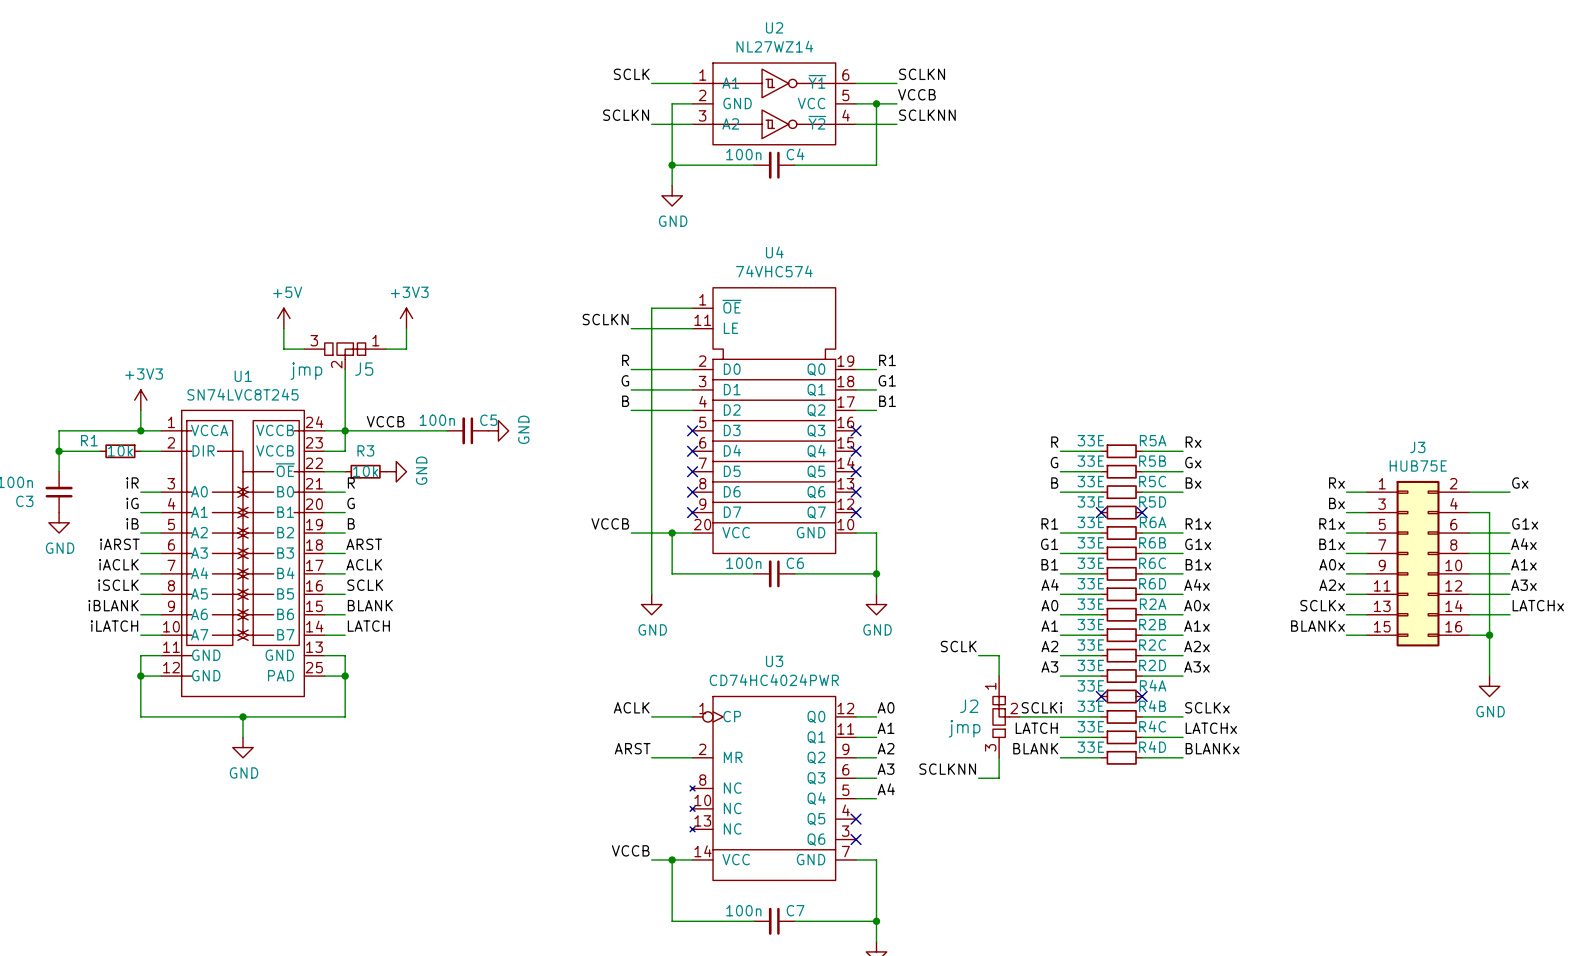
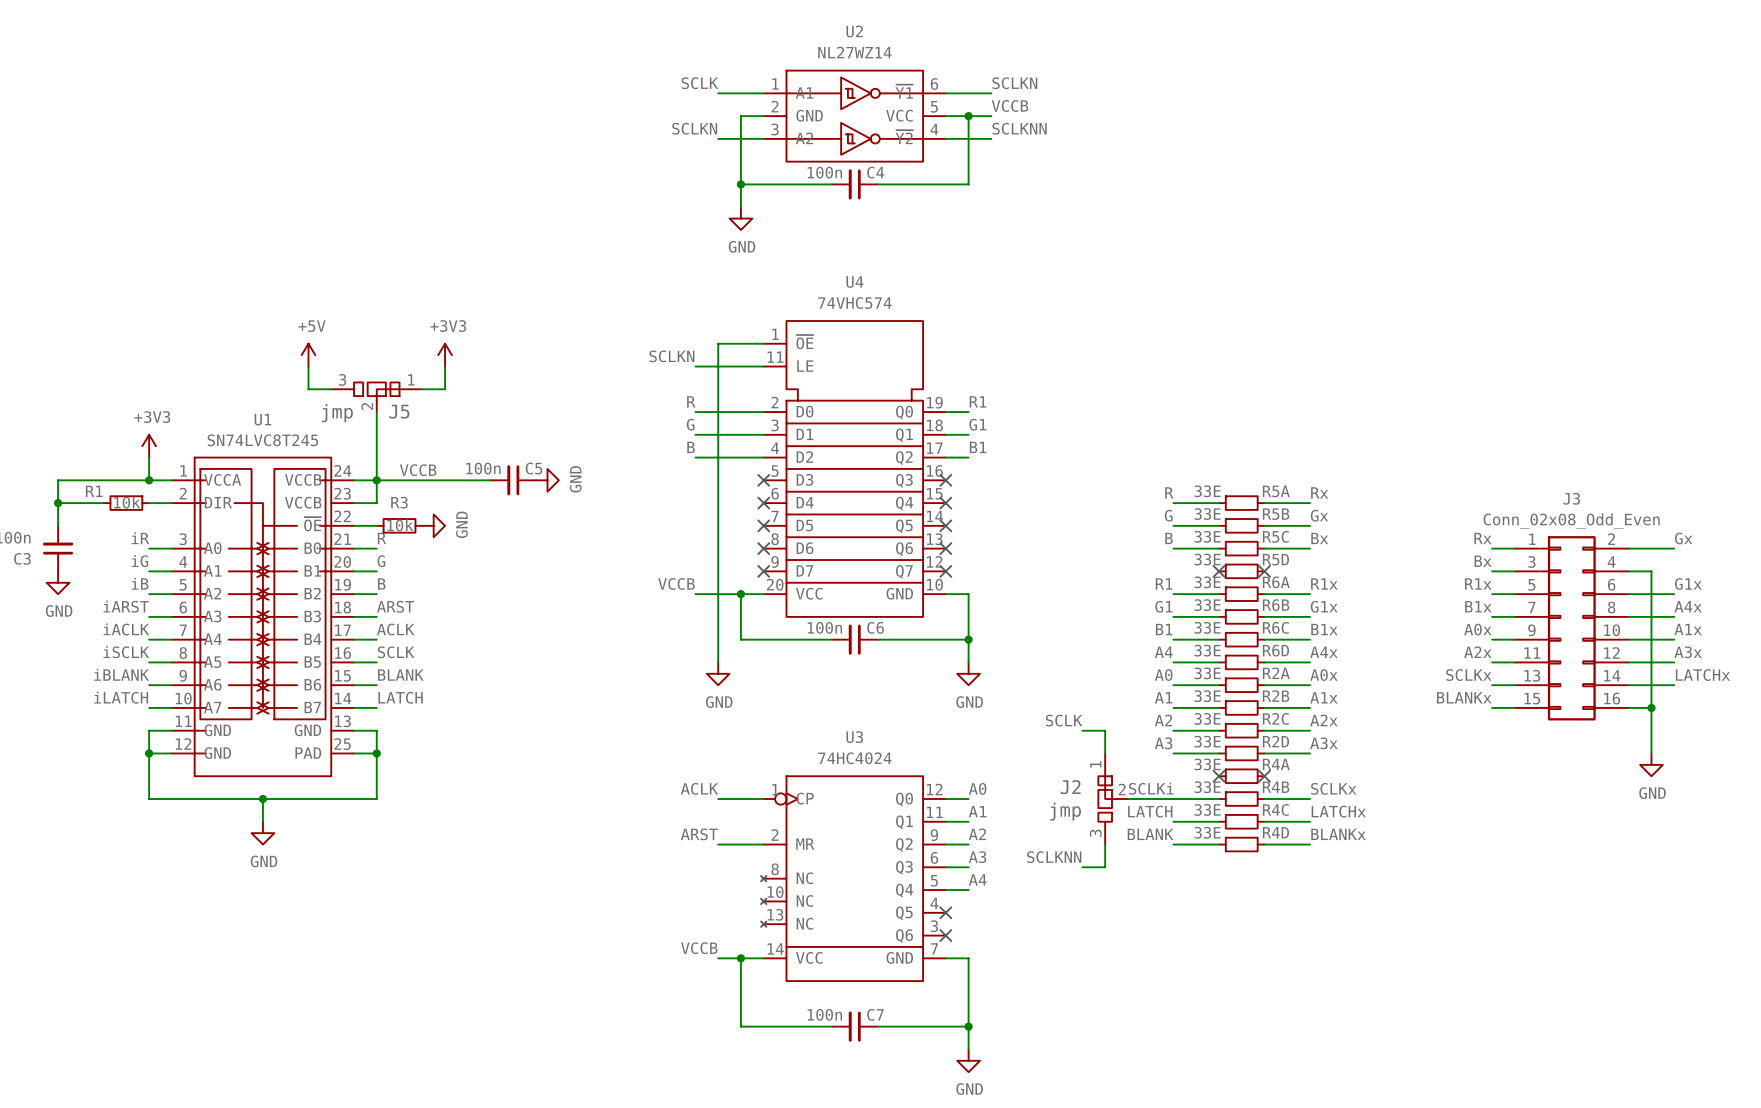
J3 value: HUB75E (1418, 466) -> Conn_02x08_Odd_Even (1571, 521)
U3 value: CD74HC4024PWR (774, 680) -> 74HC4024 (854, 758)

